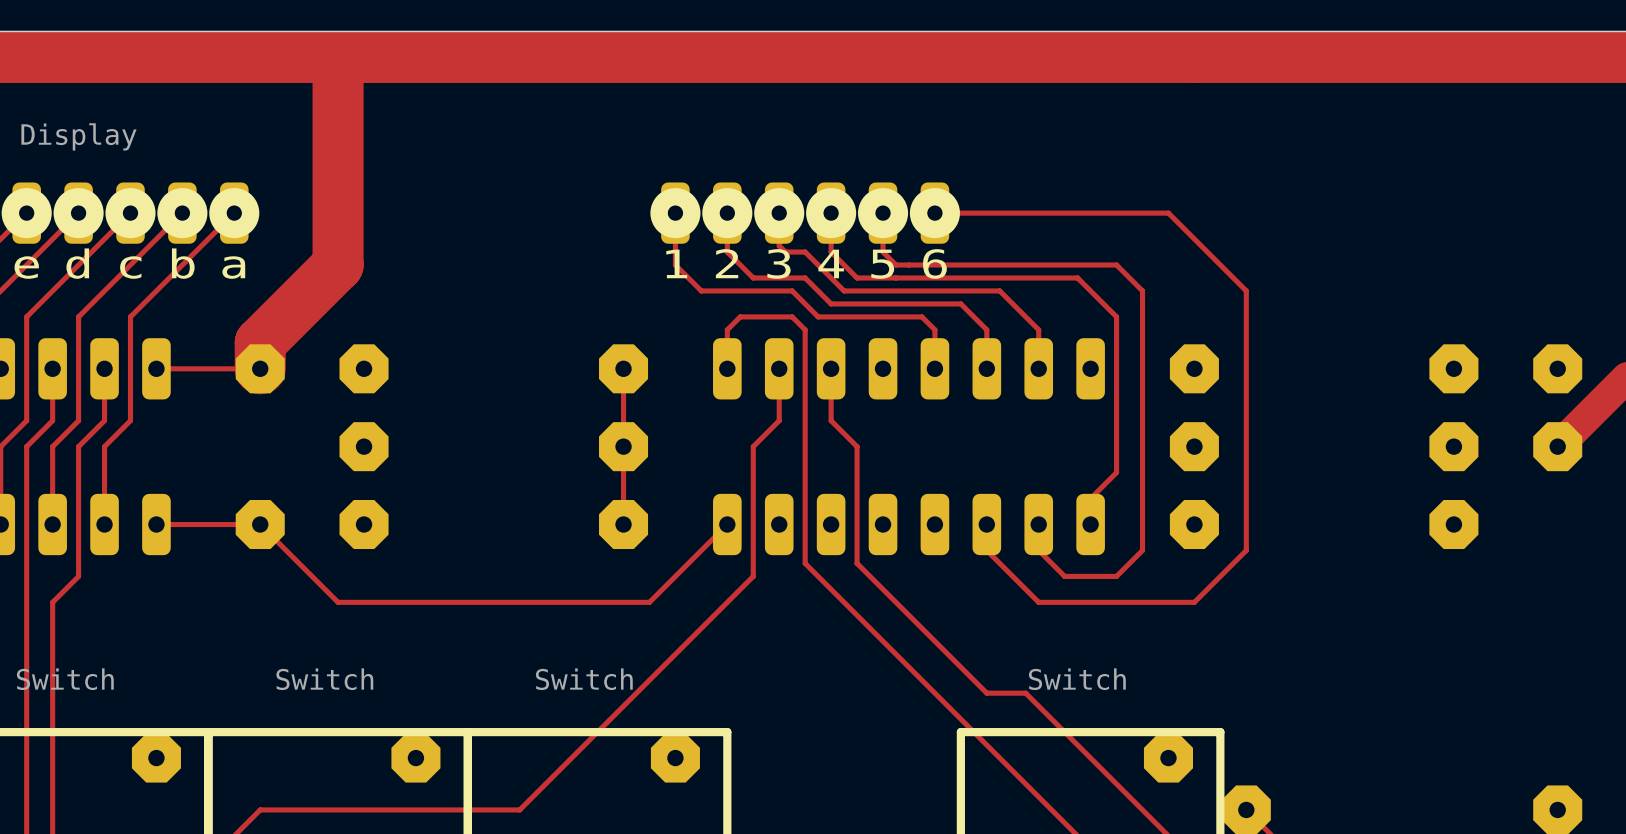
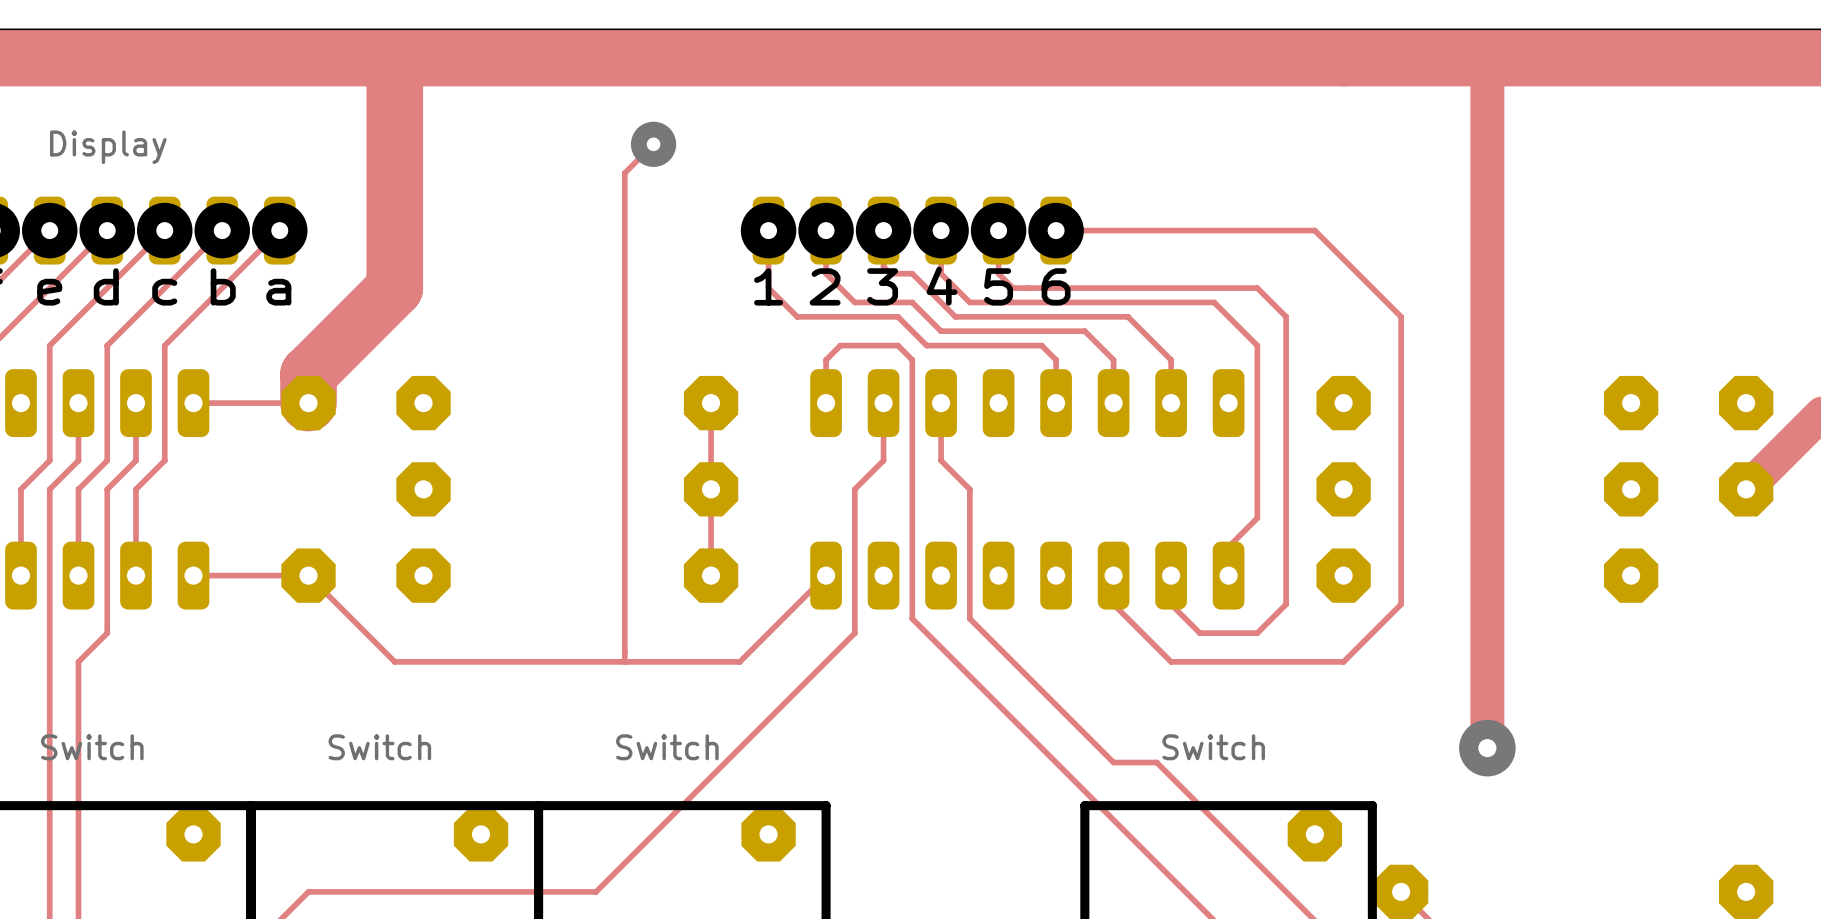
track: none -> (1487, 58) (1487, 748)
track: none -> (653, 144) (624, 173) (624, 661)
via: none -> (653, 144)
via: none -> (1487, 748)

